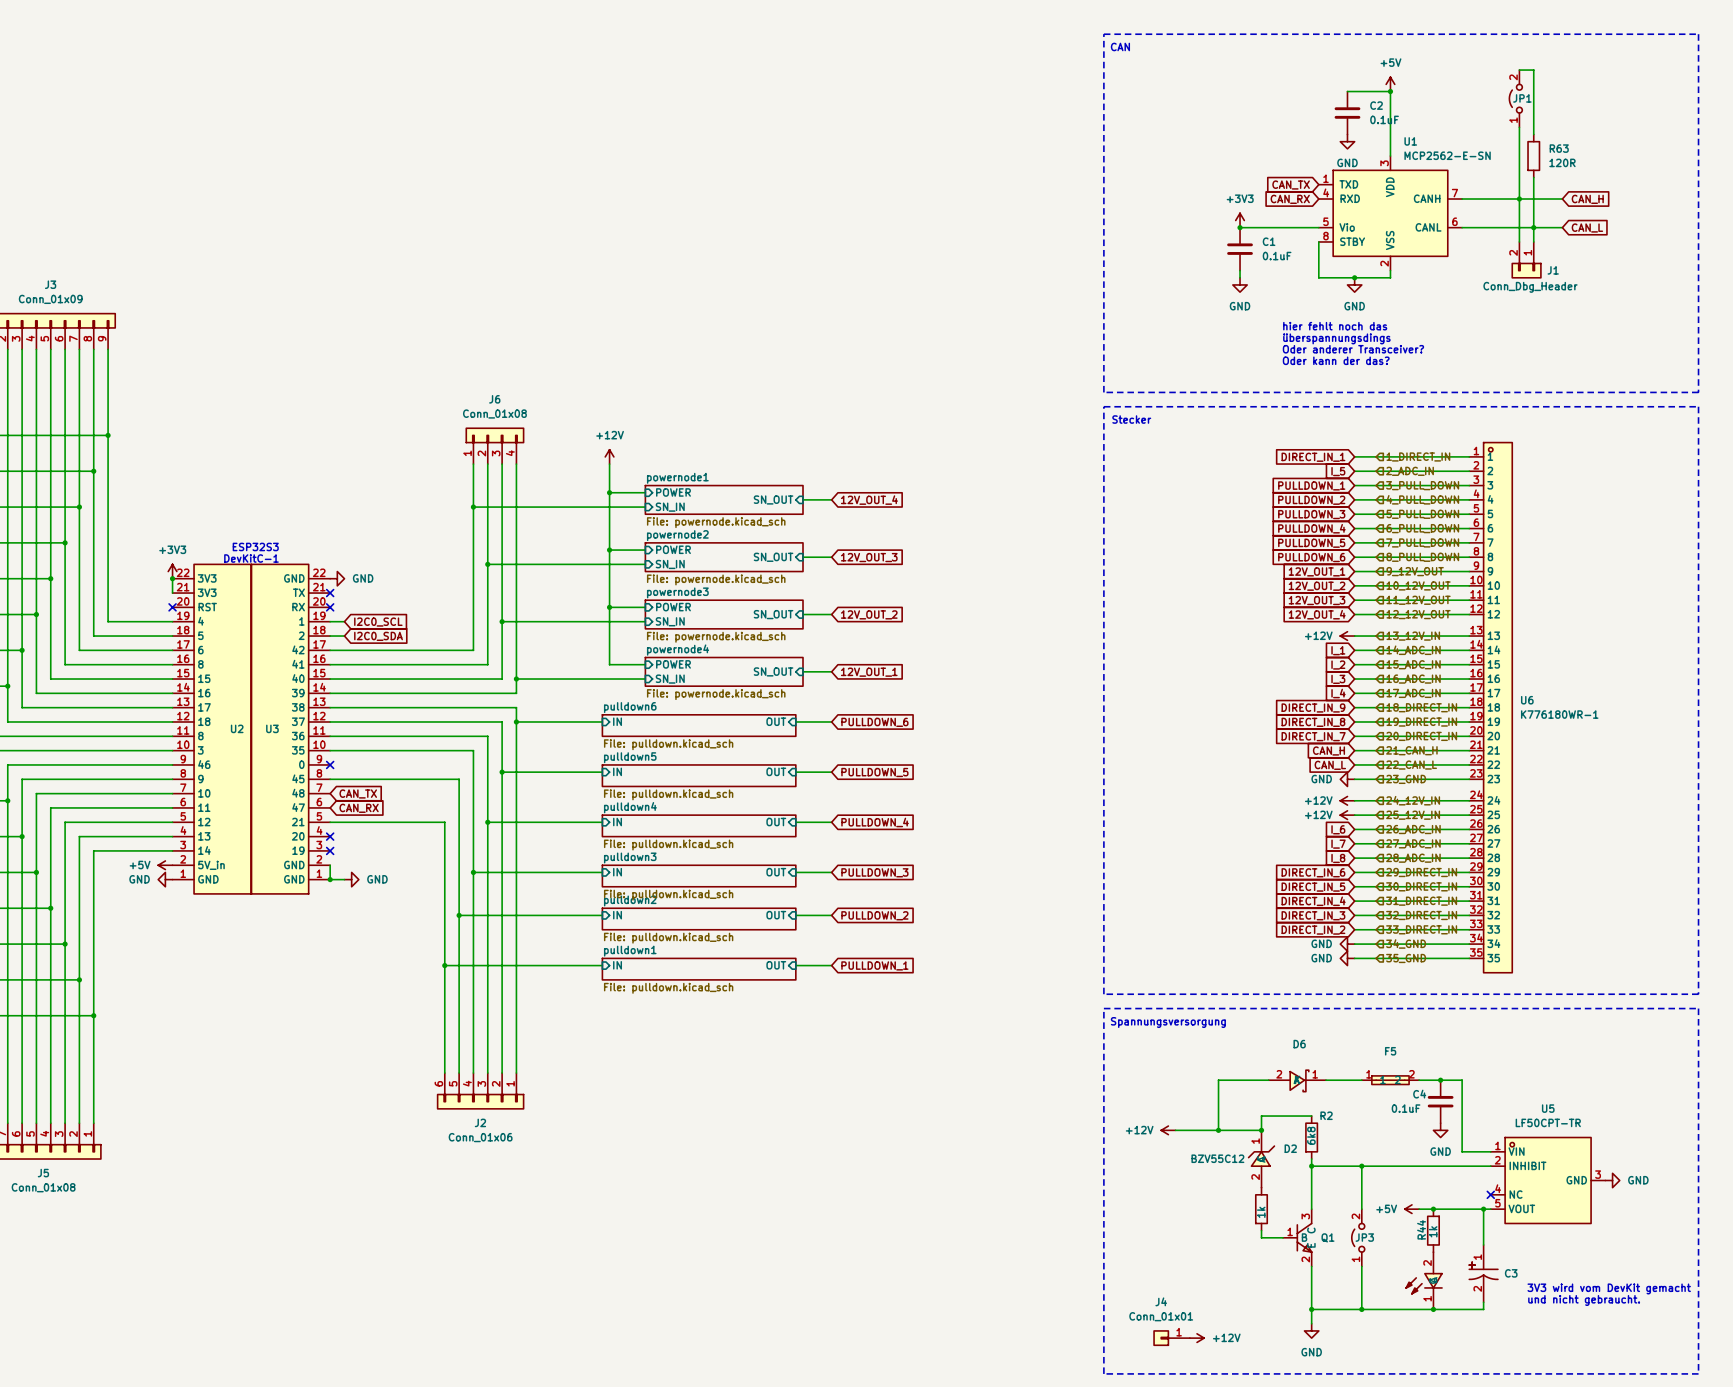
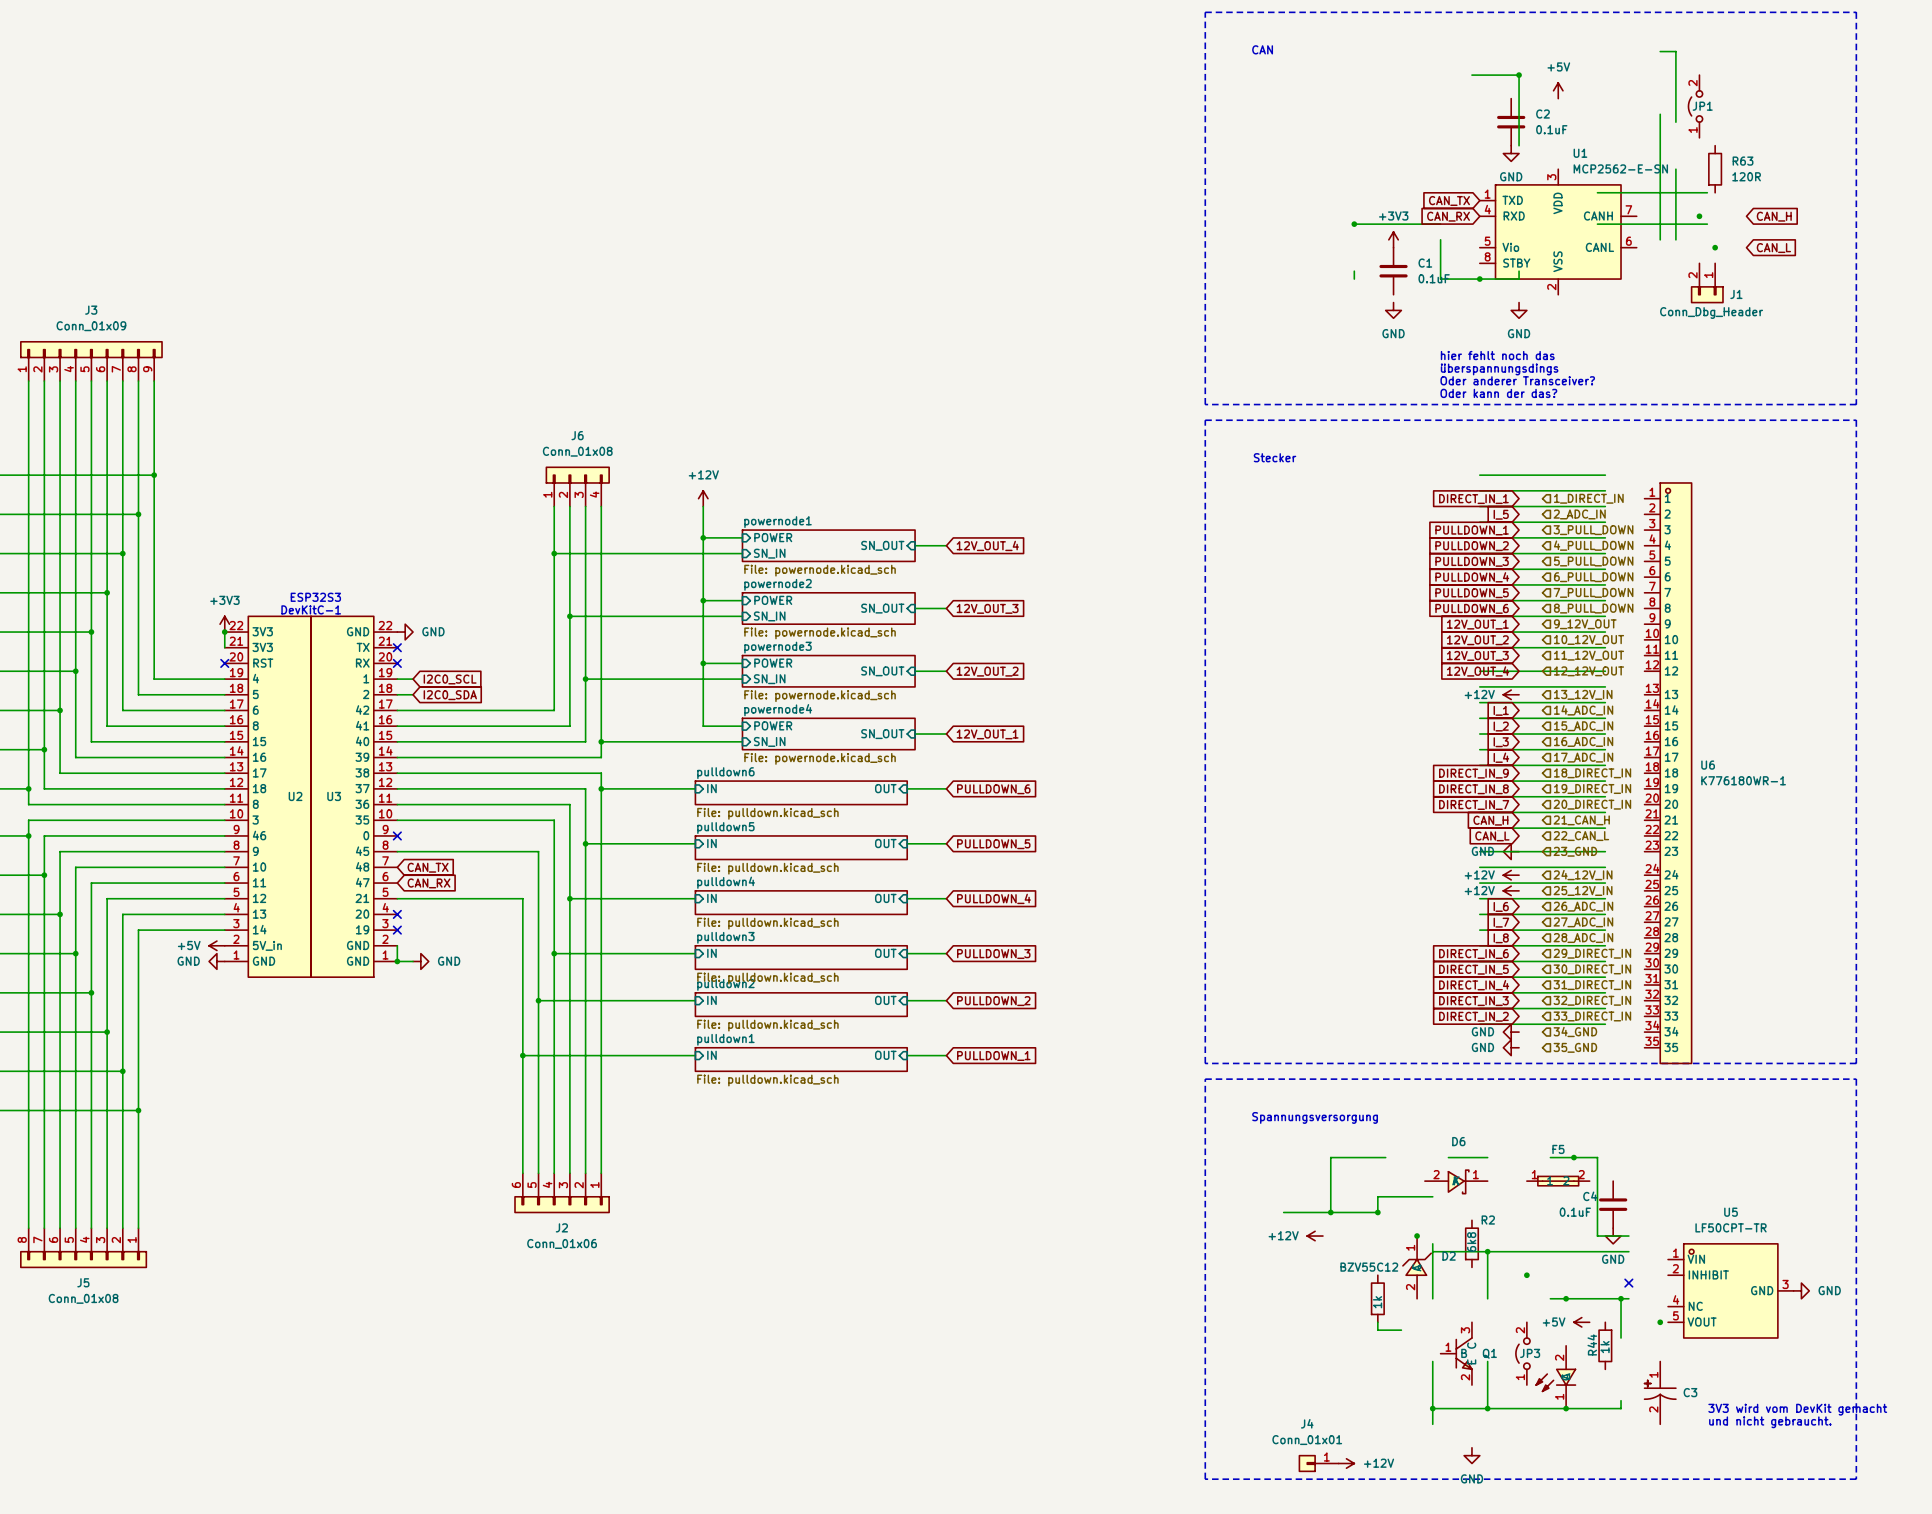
line: (1103, 34) (1698, 34) (1698, 392) (1103, 392) (1103, 34) -> (1205, 12) (1856, 12) (1856, 404) (1205, 404) (1205, 12)
junction: none -> (1519, 75)
wire: (1519, 70) (1533, 70) (1533, 134) -> (1660, 51) (1675, 51) (1675, 122)
wire: (1347, 91) (1390, 91) (1390, 156) -> (1471, 75) (1519, 75) (1519, 145)
junction: (1390, 91) -> none
wire: (1519, 127) (1519, 241) -> (1660, 114) (1660, 239)
wire: (1533, 177) (1533, 241) -> (1675, 169) (1675, 239)
wire: (1462, 199) (1562, 199) -> (1597, 192) (1707, 192)
junction: none -> (1354, 224)
wire: (1240, 227) (1318, 227) -> (1354, 224) (1440, 224)
junction: (1240, 227) -> none
wire: (1462, 227) (1562, 227) -> (1597, 224) (1707, 224)
wire: (1318, 241) (1318, 277) (1390, 277) (1390, 270) -> (1440, 239) (1440, 279) (1519, 279) (1519, 271)
junction: none -> (1479, 279)
wire: (1240, 270) (1240, 277) -> (1354, 271) (1354, 279)
junction: (1354, 277) -> none
line: (1103, 406) (1103, 994) (1698, 994) (1698, 406) (1103, 406) -> (1205, 420) (1205, 1063) (1856, 1063) (1856, 420) (1205, 420)
wire: (1354, 456) (1469, 456) -> (1479, 475) (1605, 475)
wire: (1354, 471) (1469, 471) -> (1479, 490) (1605, 490)
wire: (1354, 485) (1469, 485) -> (1479, 506) (1605, 506)
wire: (1354, 499) (1469, 499) -> (1479, 522) (1605, 522)
wire: (1354, 514) (1469, 514) -> (1479, 537) (1605, 537)
wire: (1354, 528) (1469, 528) -> (1479, 553) (1605, 553)
wire: (1354, 542) (1469, 542) -> (1479, 569) (1605, 569)
wire: (1354, 557) (1469, 557) -> (1479, 584) (1605, 584)
wire: (1354, 571) (1469, 571) -> (1479, 600) (1605, 600)
wire: (1354, 585) (1469, 585) -> (1479, 616) (1605, 616)
wire: none -> (1479, 647) (1605, 647)
wire: (1354, 600) (1469, 600) -> (1479, 632) (1605, 632)
wire: (1433, 614) (1469, 614) -> (1479, 671) (1519, 671)
wire: (1354, 636) (1469, 636) -> (1479, 828) (1605, 828)
wire: (1354, 650) (1469, 650) -> (1479, 686) (1605, 686)
wire: (1354, 664) (1469, 664) -> (1479, 702) (1605, 702)
wire: (1354, 679) (1469, 679) -> (1479, 718) (1605, 718)
wire: (1354, 693) (1469, 693) -> (1479, 734) (1605, 734)
wire: (1354, 707) (1469, 707) -> (1479, 749) (1605, 749)
wire: (1354, 721) (1469, 721) -> (1479, 765) (1605, 765)
wire: (1354, 736) (1469, 736) -> (1479, 781) (1605, 781)
wire: (1354, 750) (1469, 750) -> (1479, 796) (1605, 796)
wire: (1354, 764) (1469, 764) -> (1479, 812) (1605, 812)
wire: (1433, 779) (1469, 779) -> (1479, 851) (1519, 851)
wire: (1354, 800) (1469, 800) -> none
wire: (1354, 815) (1469, 815) -> (1479, 867) (1605, 867)
wire: (1354, 829) (1469, 829) -> (1479, 883) (1605, 883)
wire: (1354, 843) (1469, 843) -> (1479, 898) (1605, 898)
wire: (1354, 858) (1469, 858) -> (1479, 914) (1605, 914)
wire: (1354, 872) (1469, 872) -> (1479, 930) (1605, 930)
wire: (1354, 886) (1469, 886) -> (1479, 945) (1605, 945)
wire: (1354, 901) (1469, 901) -> (1479, 961) (1605, 961)
wire: (1354, 915) (1469, 915) -> (1479, 977) (1605, 977)
wire: (1354, 929) (1469, 929) -> (1479, 992) (1605, 992)
wire: (1354, 944) (1469, 944) -> (1479, 1008) (1605, 1008)
wire: (1354, 958) (1469, 958) -> (1479, 1024) (1605, 1024)
line: (1103, 1008) (1103, 1373) (1698, 1373) (1698, 1008) (1103, 1008) -> (1205, 1079) (1205, 1479) (1856, 1479) (1856, 1079) (1205, 1079)
junction: none -> (1573, 1157)
wire: (1268, 1080) (1218, 1080) (1218, 1130) -> (1385, 1157) (1330, 1157) (1330, 1212)
wire: (1325, 1080) (1361, 1080) -> (1448, 1157) (1487, 1157)
wire: (1419, 1080) (1462, 1080) (1462, 1151) (1490, 1151) -> (1550, 1157) (1597, 1157) (1597, 1236) (1628, 1236)
junction: (1440, 1080) -> none
junction: none -> (1330, 1212)
junction: none -> (1377, 1212)
wire: (1311, 1116) (1261, 1116) (1261, 1130) (1175, 1130) -> (1432, 1196) (1377, 1196) (1377, 1212) (1283, 1212)
junction: (1218, 1130) -> none
wire: (1311, 1159) (1311, 1209) -> (1432, 1243) (1432, 1298)
wire: (1311, 1166) (1490, 1166) -> (1432, 1251) (1628, 1251)
junction position: (1311, 1166) -> (1487, 1251)
wire: (1361, 1166) (1361, 1209) -> (1487, 1251) (1487, 1298)
no-connect mark: none -> (1628, 1283)
junction: none -> (1566, 1298)
junction: none -> (1621, 1298)
no-connect mark: (1490, 1194) -> none
part position: (1261, 1209) -> (1377, 1298)
wire: (1419, 1209) (1490, 1209) -> (1550, 1298) (1628, 1298)
junction: (1433, 1209) -> none
wire: (1483, 1209) (1483, 1244) -> (1621, 1298) (1621, 1337)
wire: (1261, 1230) (1261, 1237) (1283, 1237) -> (1377, 1322) (1377, 1330) (1401, 1330)
wire: (1311, 1266) (1311, 1323) -> (1432, 1361) (1432, 1424)
wire: (1361, 1266) (1361, 1309) -> (1487, 1361) (1487, 1408)
part position: (1424, 1280) -> (1555, 1377)
junction: none -> (1432, 1408)
junction: none -> (1487, 1408)
junction: none -> (1566, 1408)
wire: (1483, 1302) (1483, 1309) (1311, 1309) -> (1621, 1400) (1621, 1408) (1432, 1408)
junction: (1311, 1309) -> none
junction: (1361, 1309) -> none
junction: (1433, 1309) -> none

